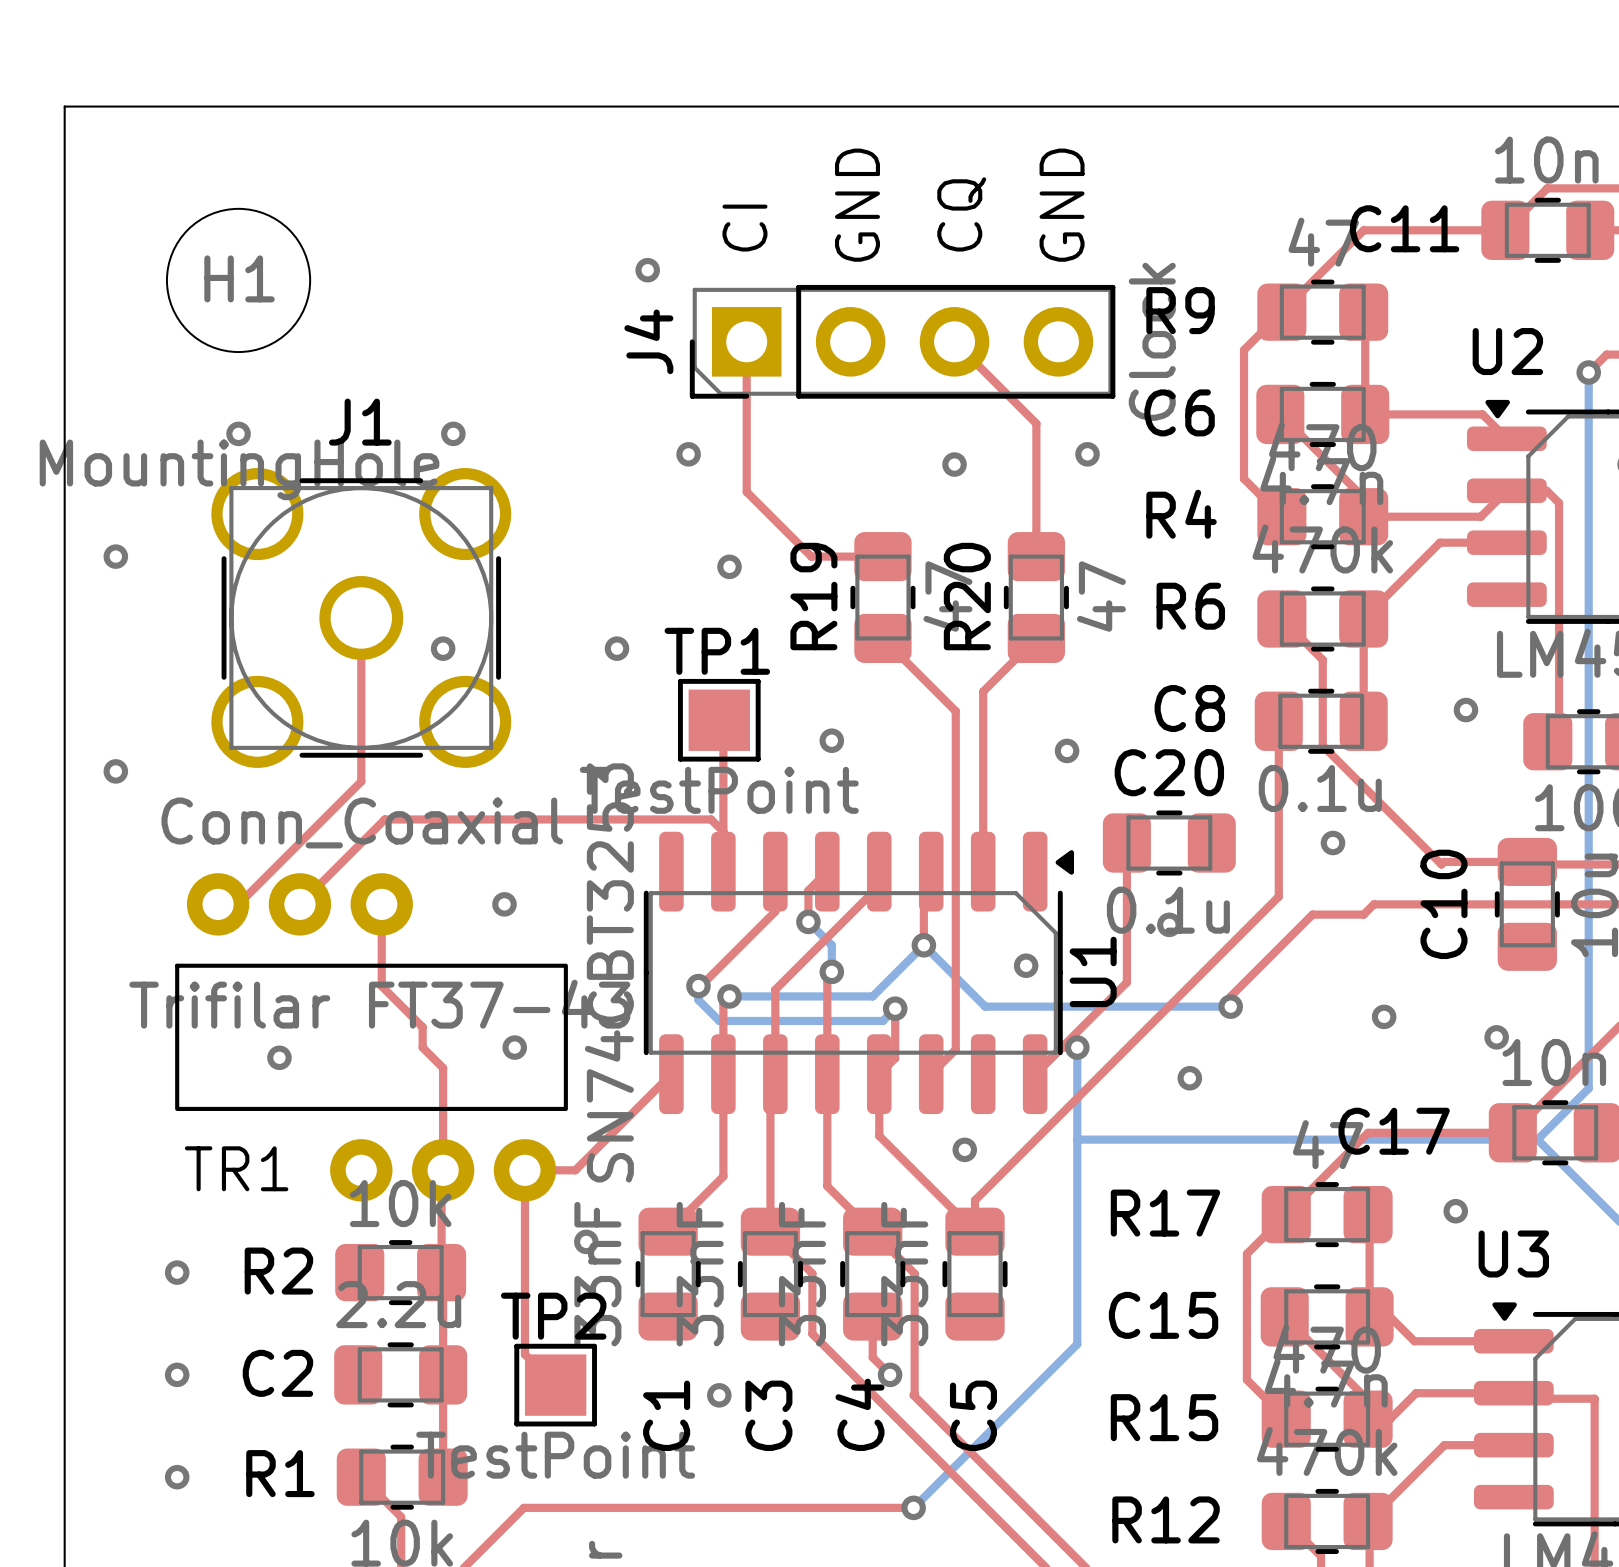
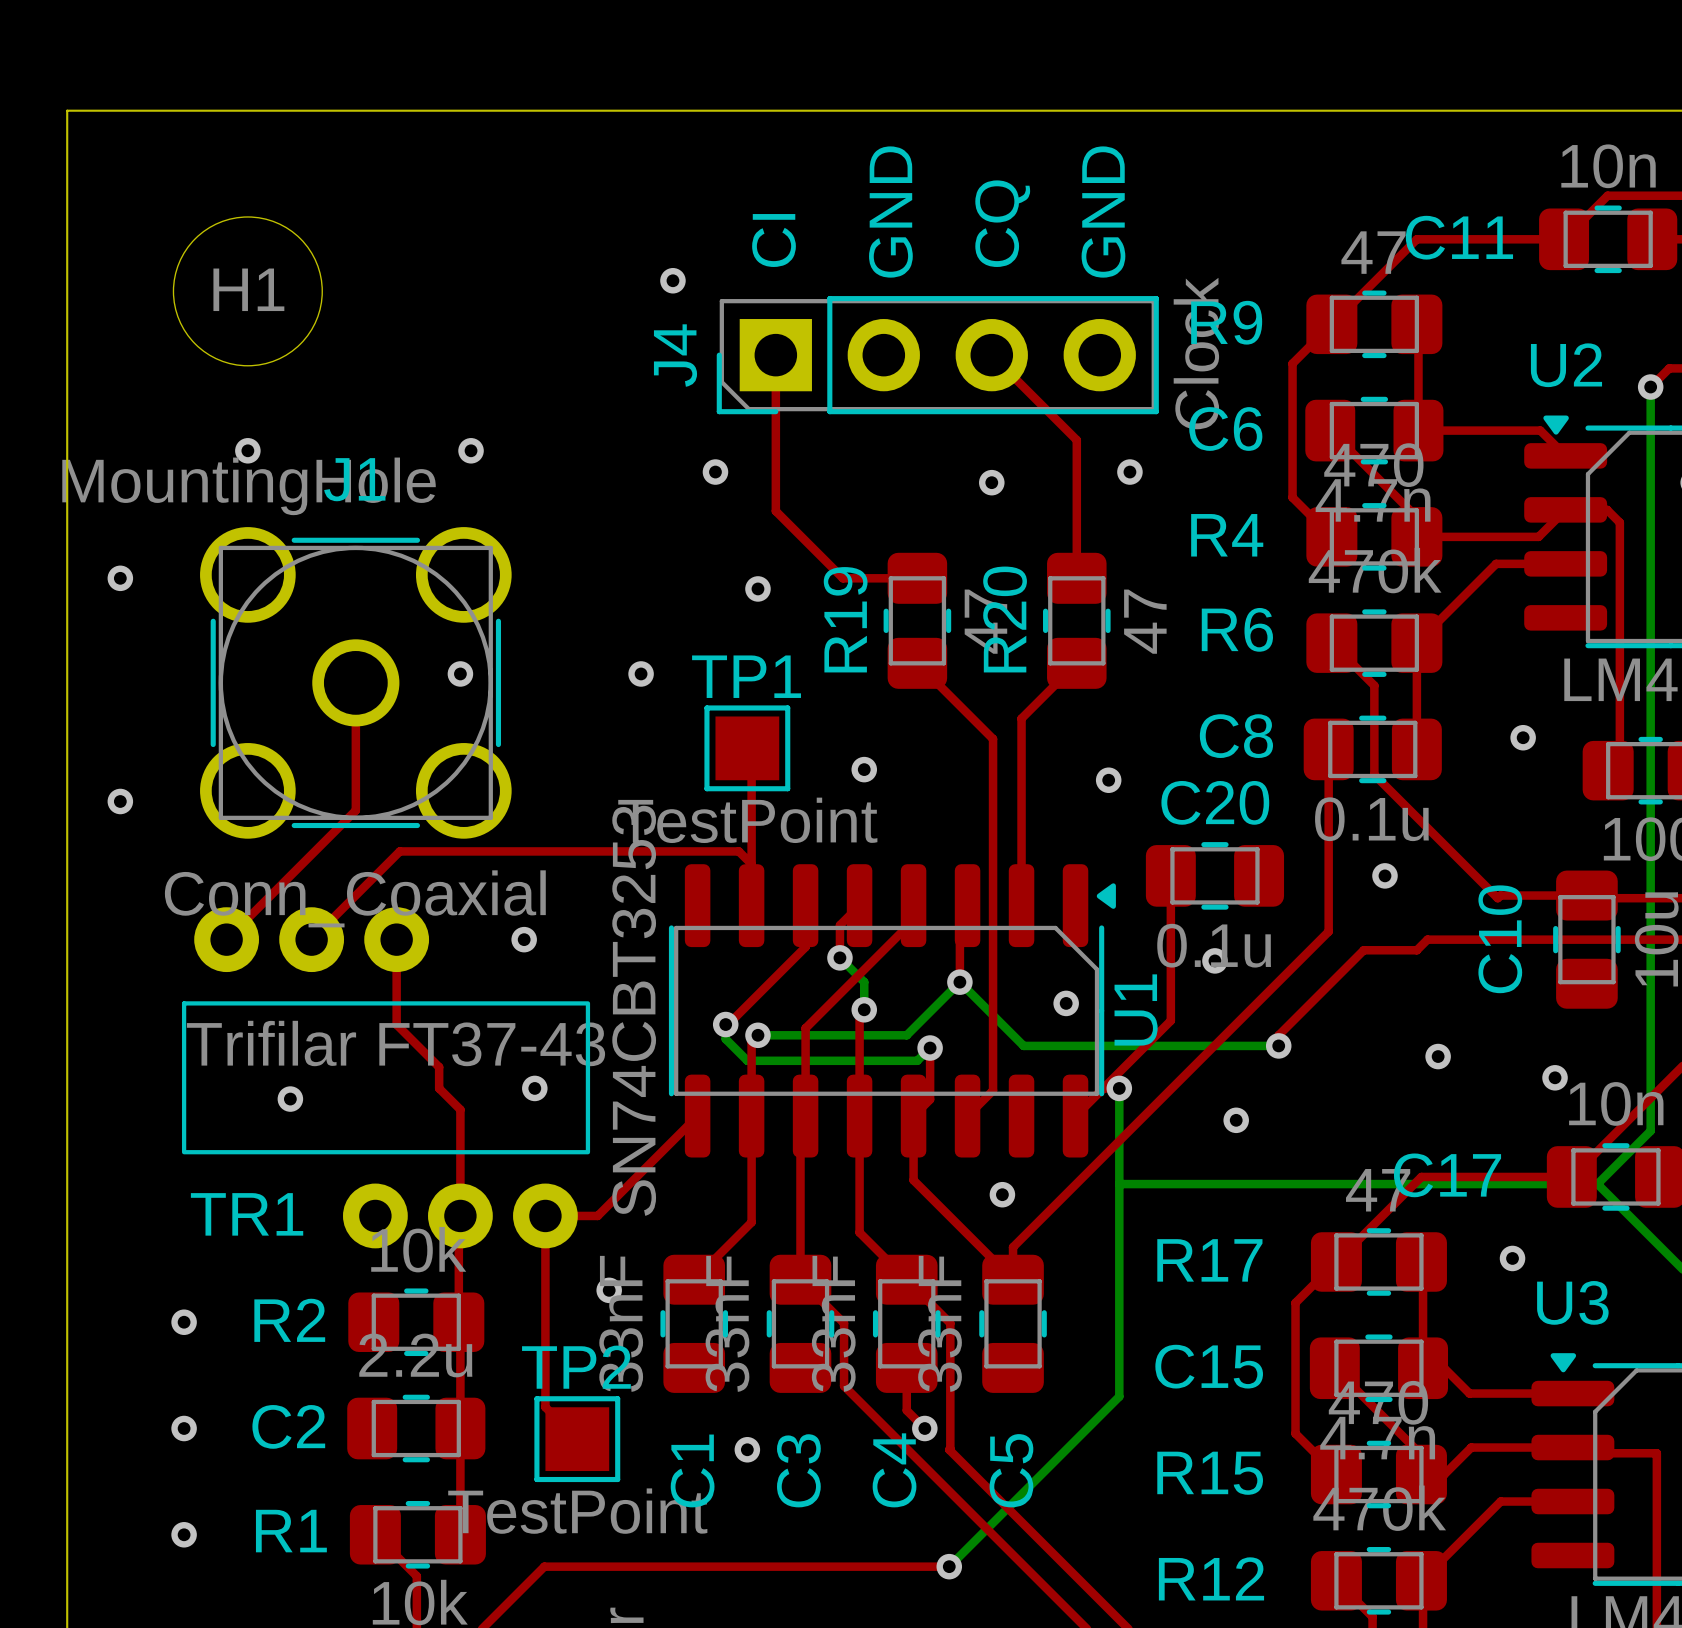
top track: (361, 617) (361, 781) (238, 904) (218, 904) -> (355, 682) (355, 810) (226, 939)
J1 position: (361, 617) -> (355, 682)

